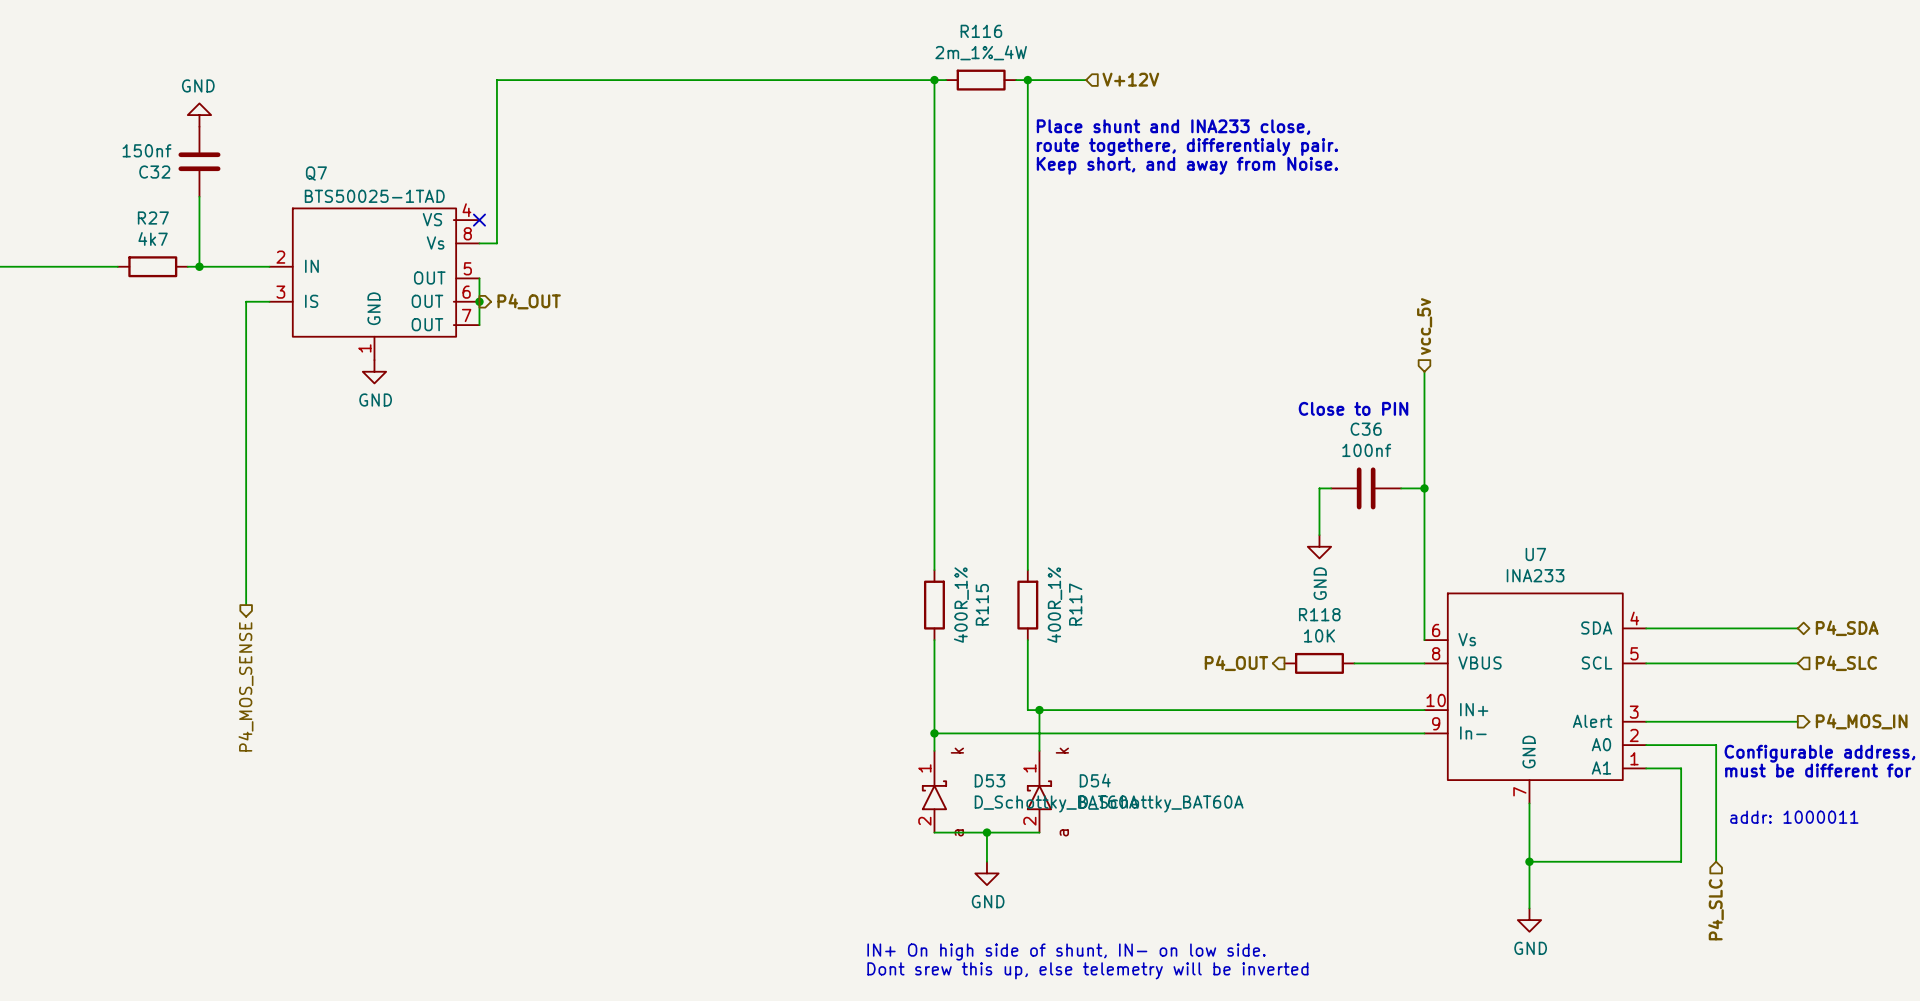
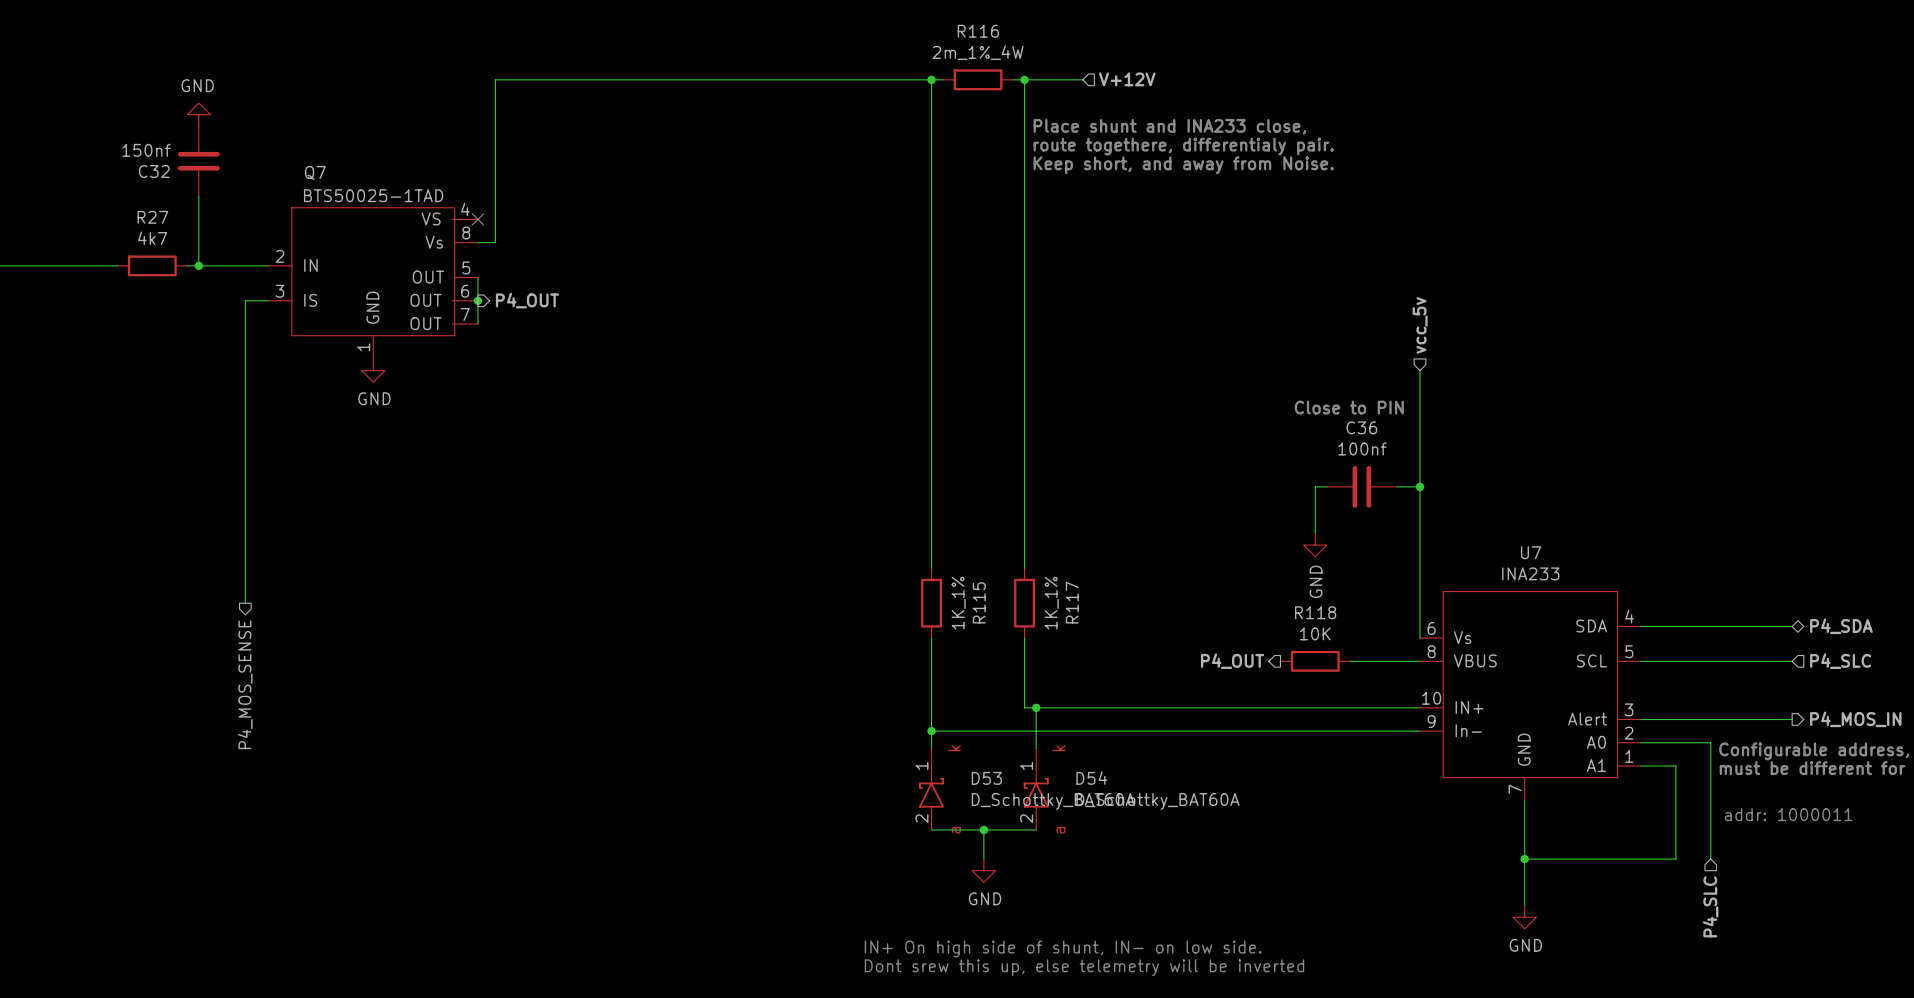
R115 value: 400R_1% (961, 605) -> 1K_1% (958, 603)
R117 value: 400R_1% (1054, 605) -> 1K_1% (1051, 603)

